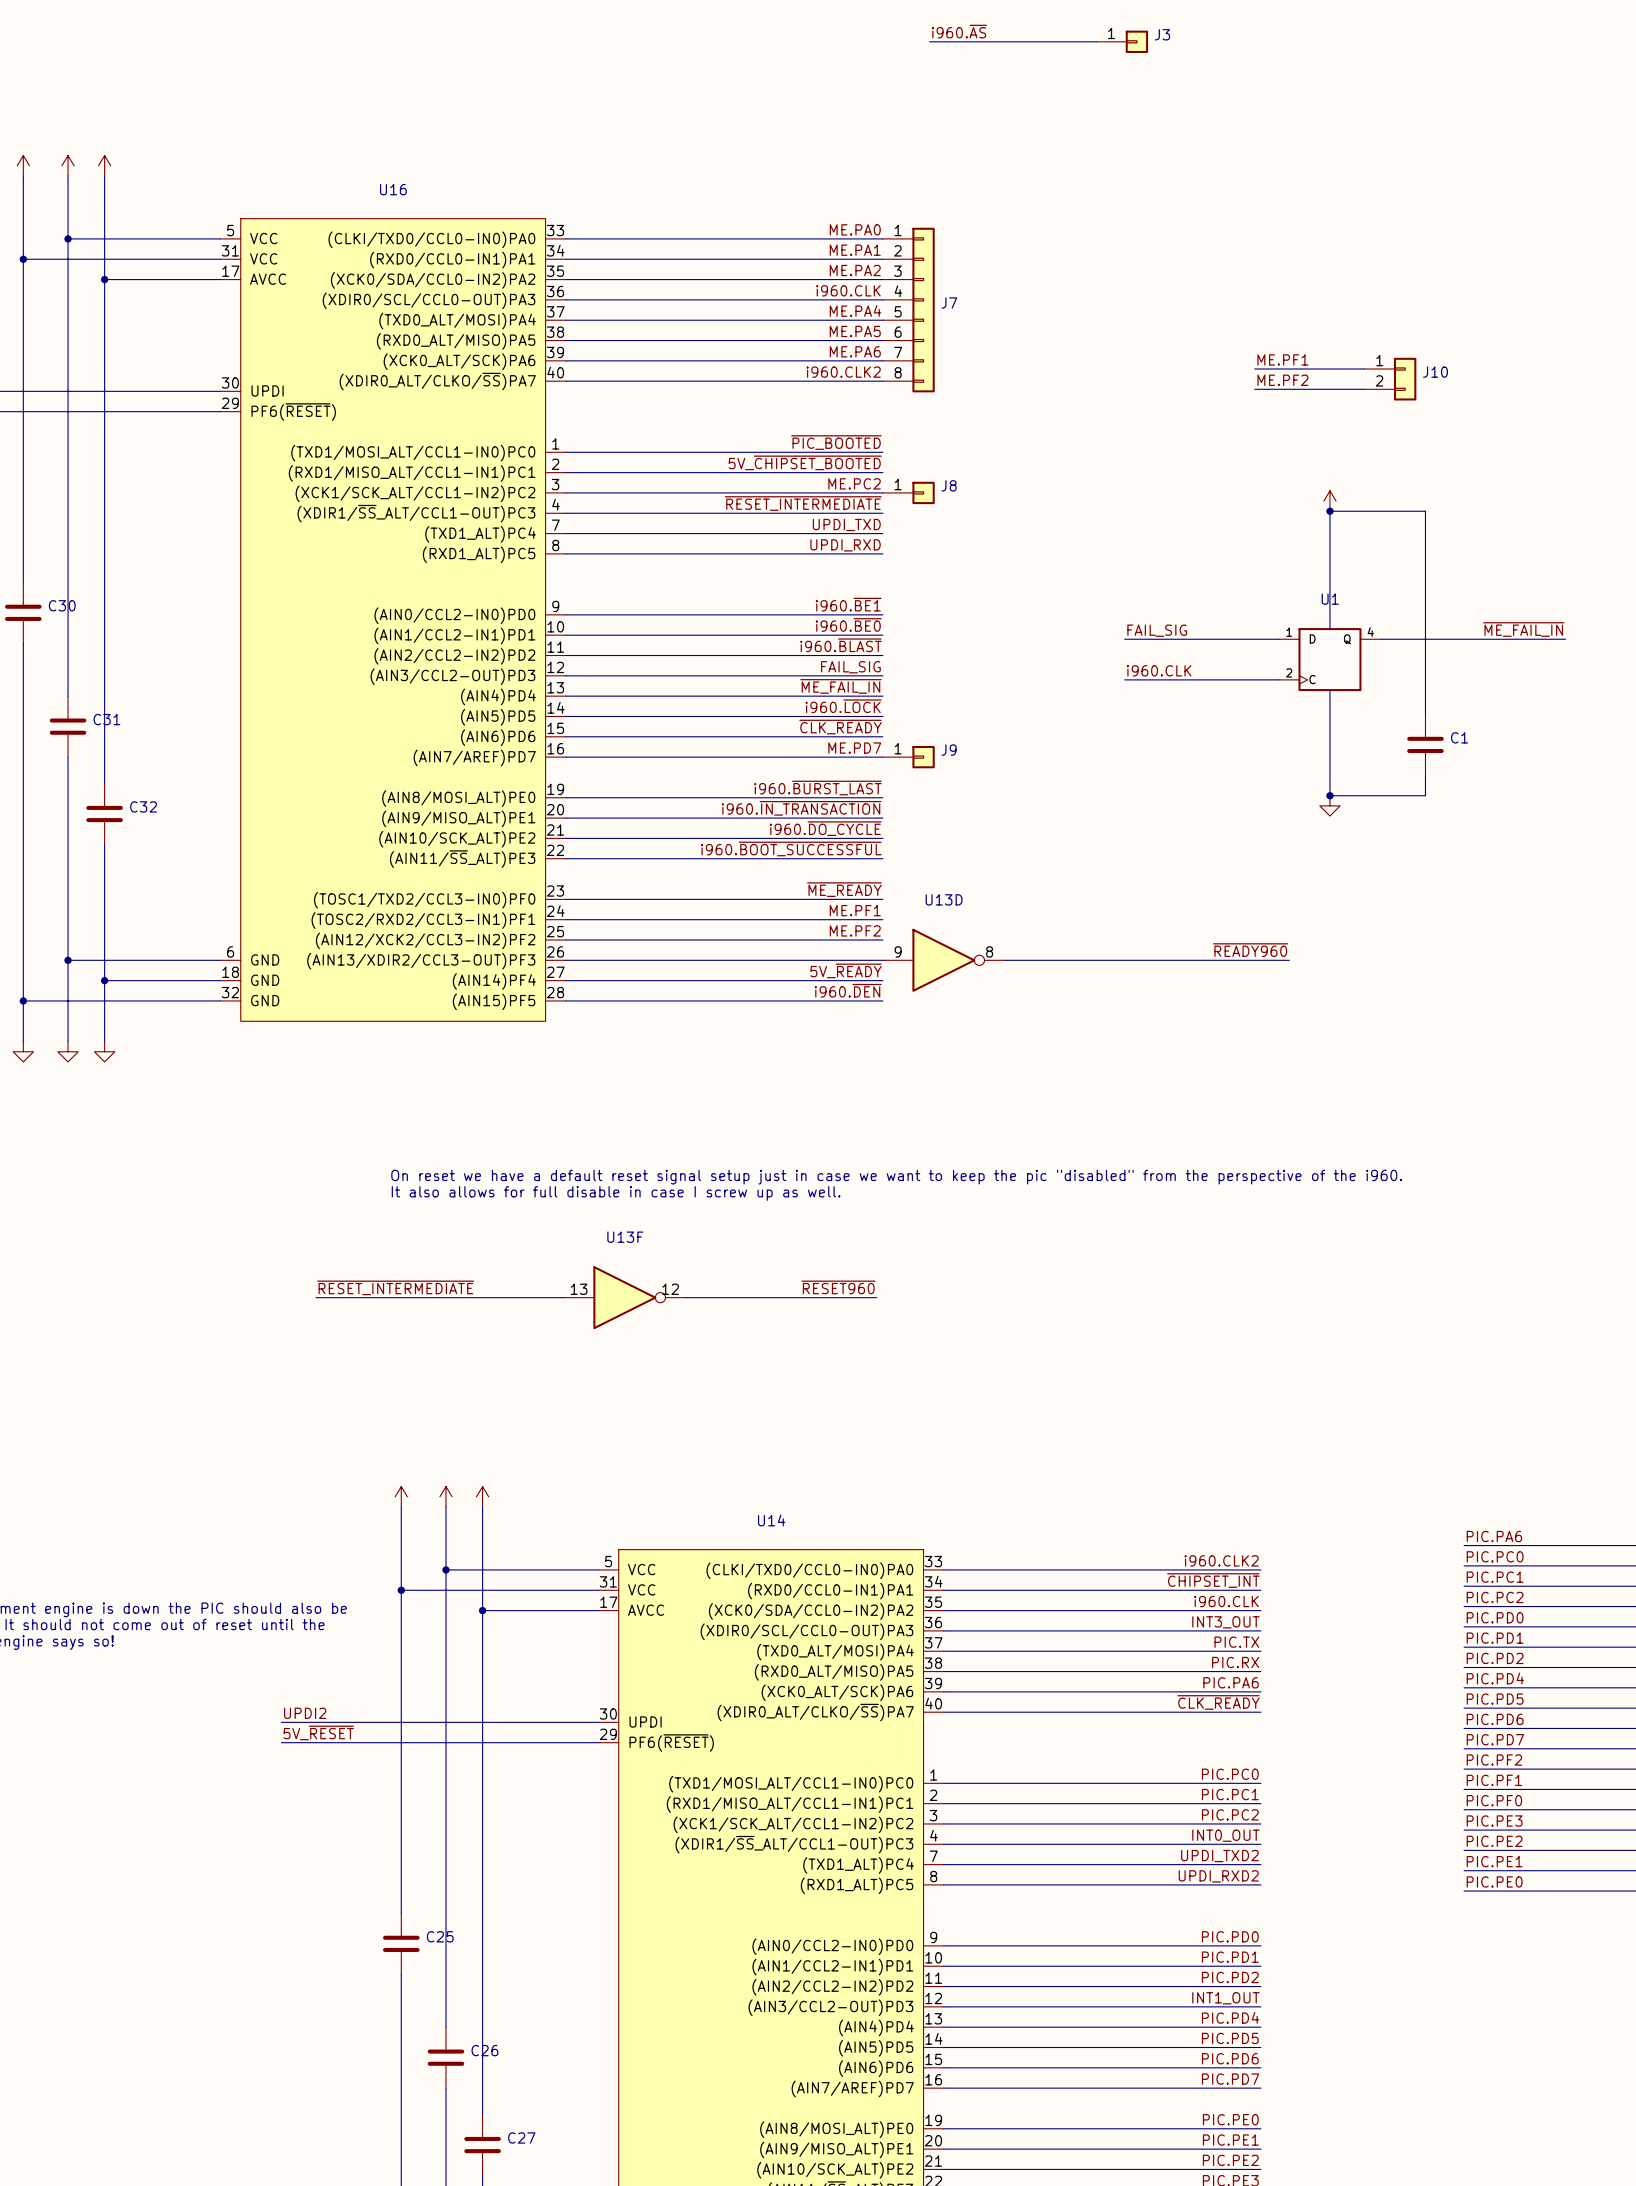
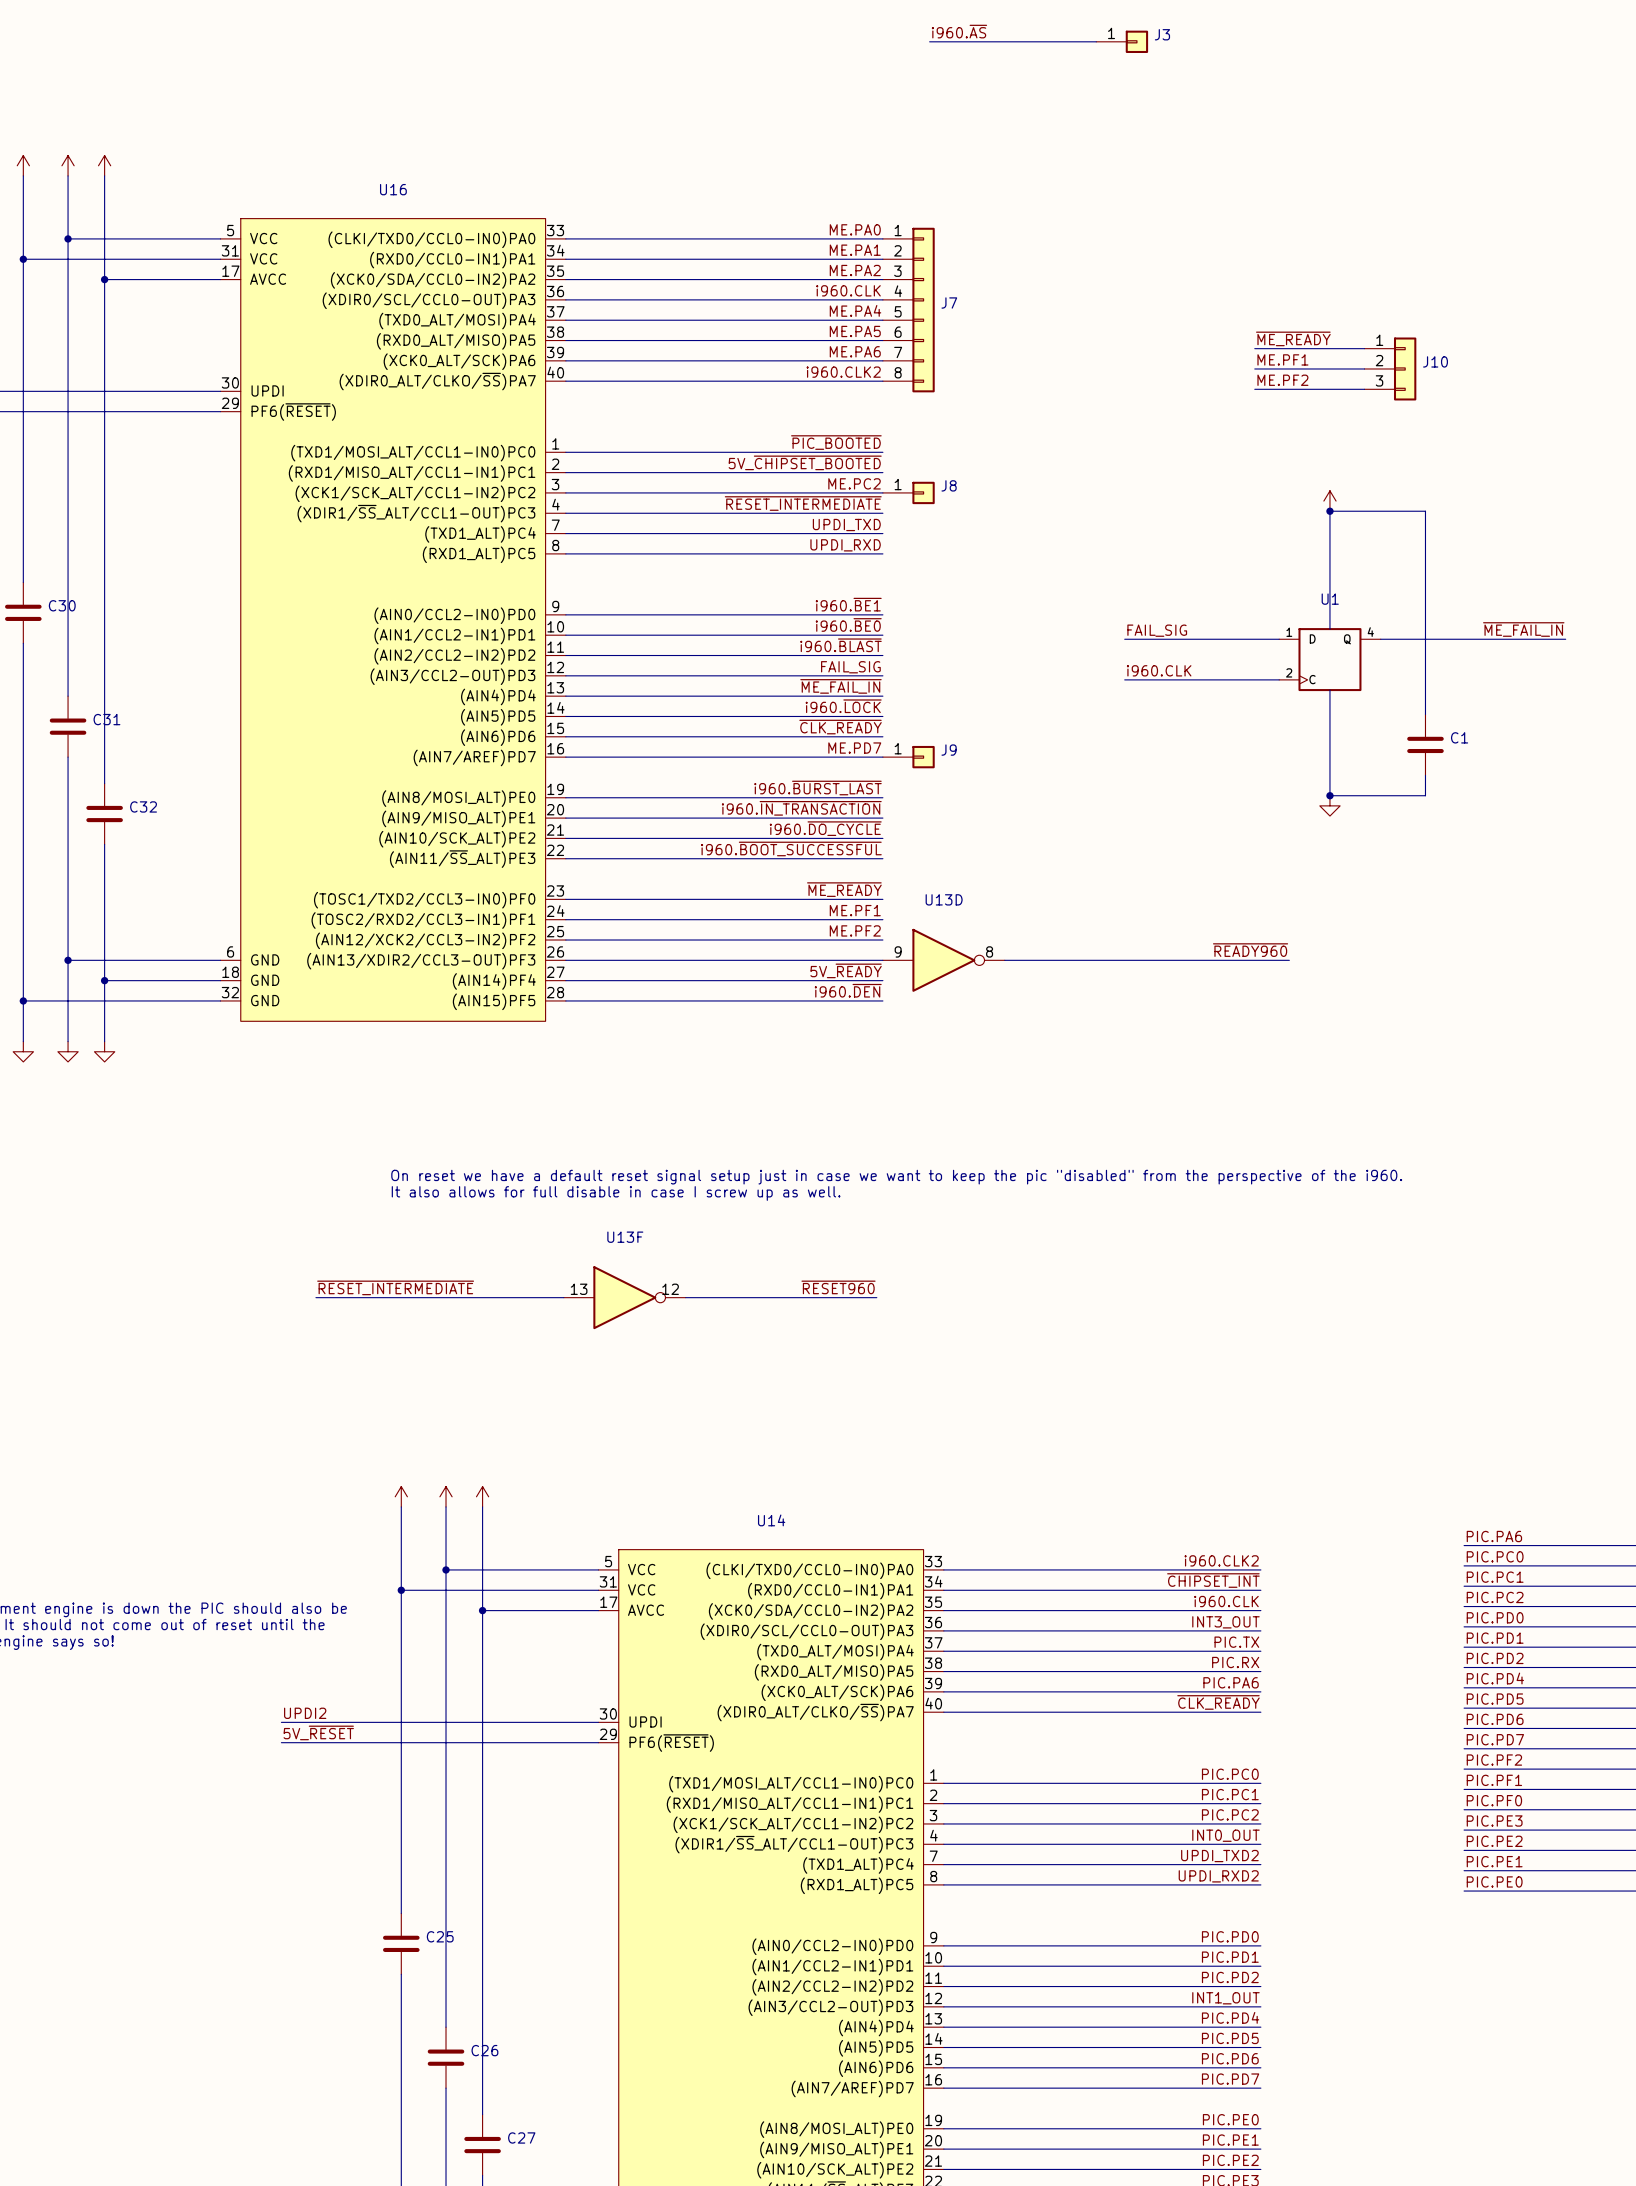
label: none -> ~{ME_READY} (1293, 338)
wire: none -> (1254, 348) (1364, 348)
J10 symbol: [1364, 357, 1417, 401] -> [1364, 337, 1417, 401]

